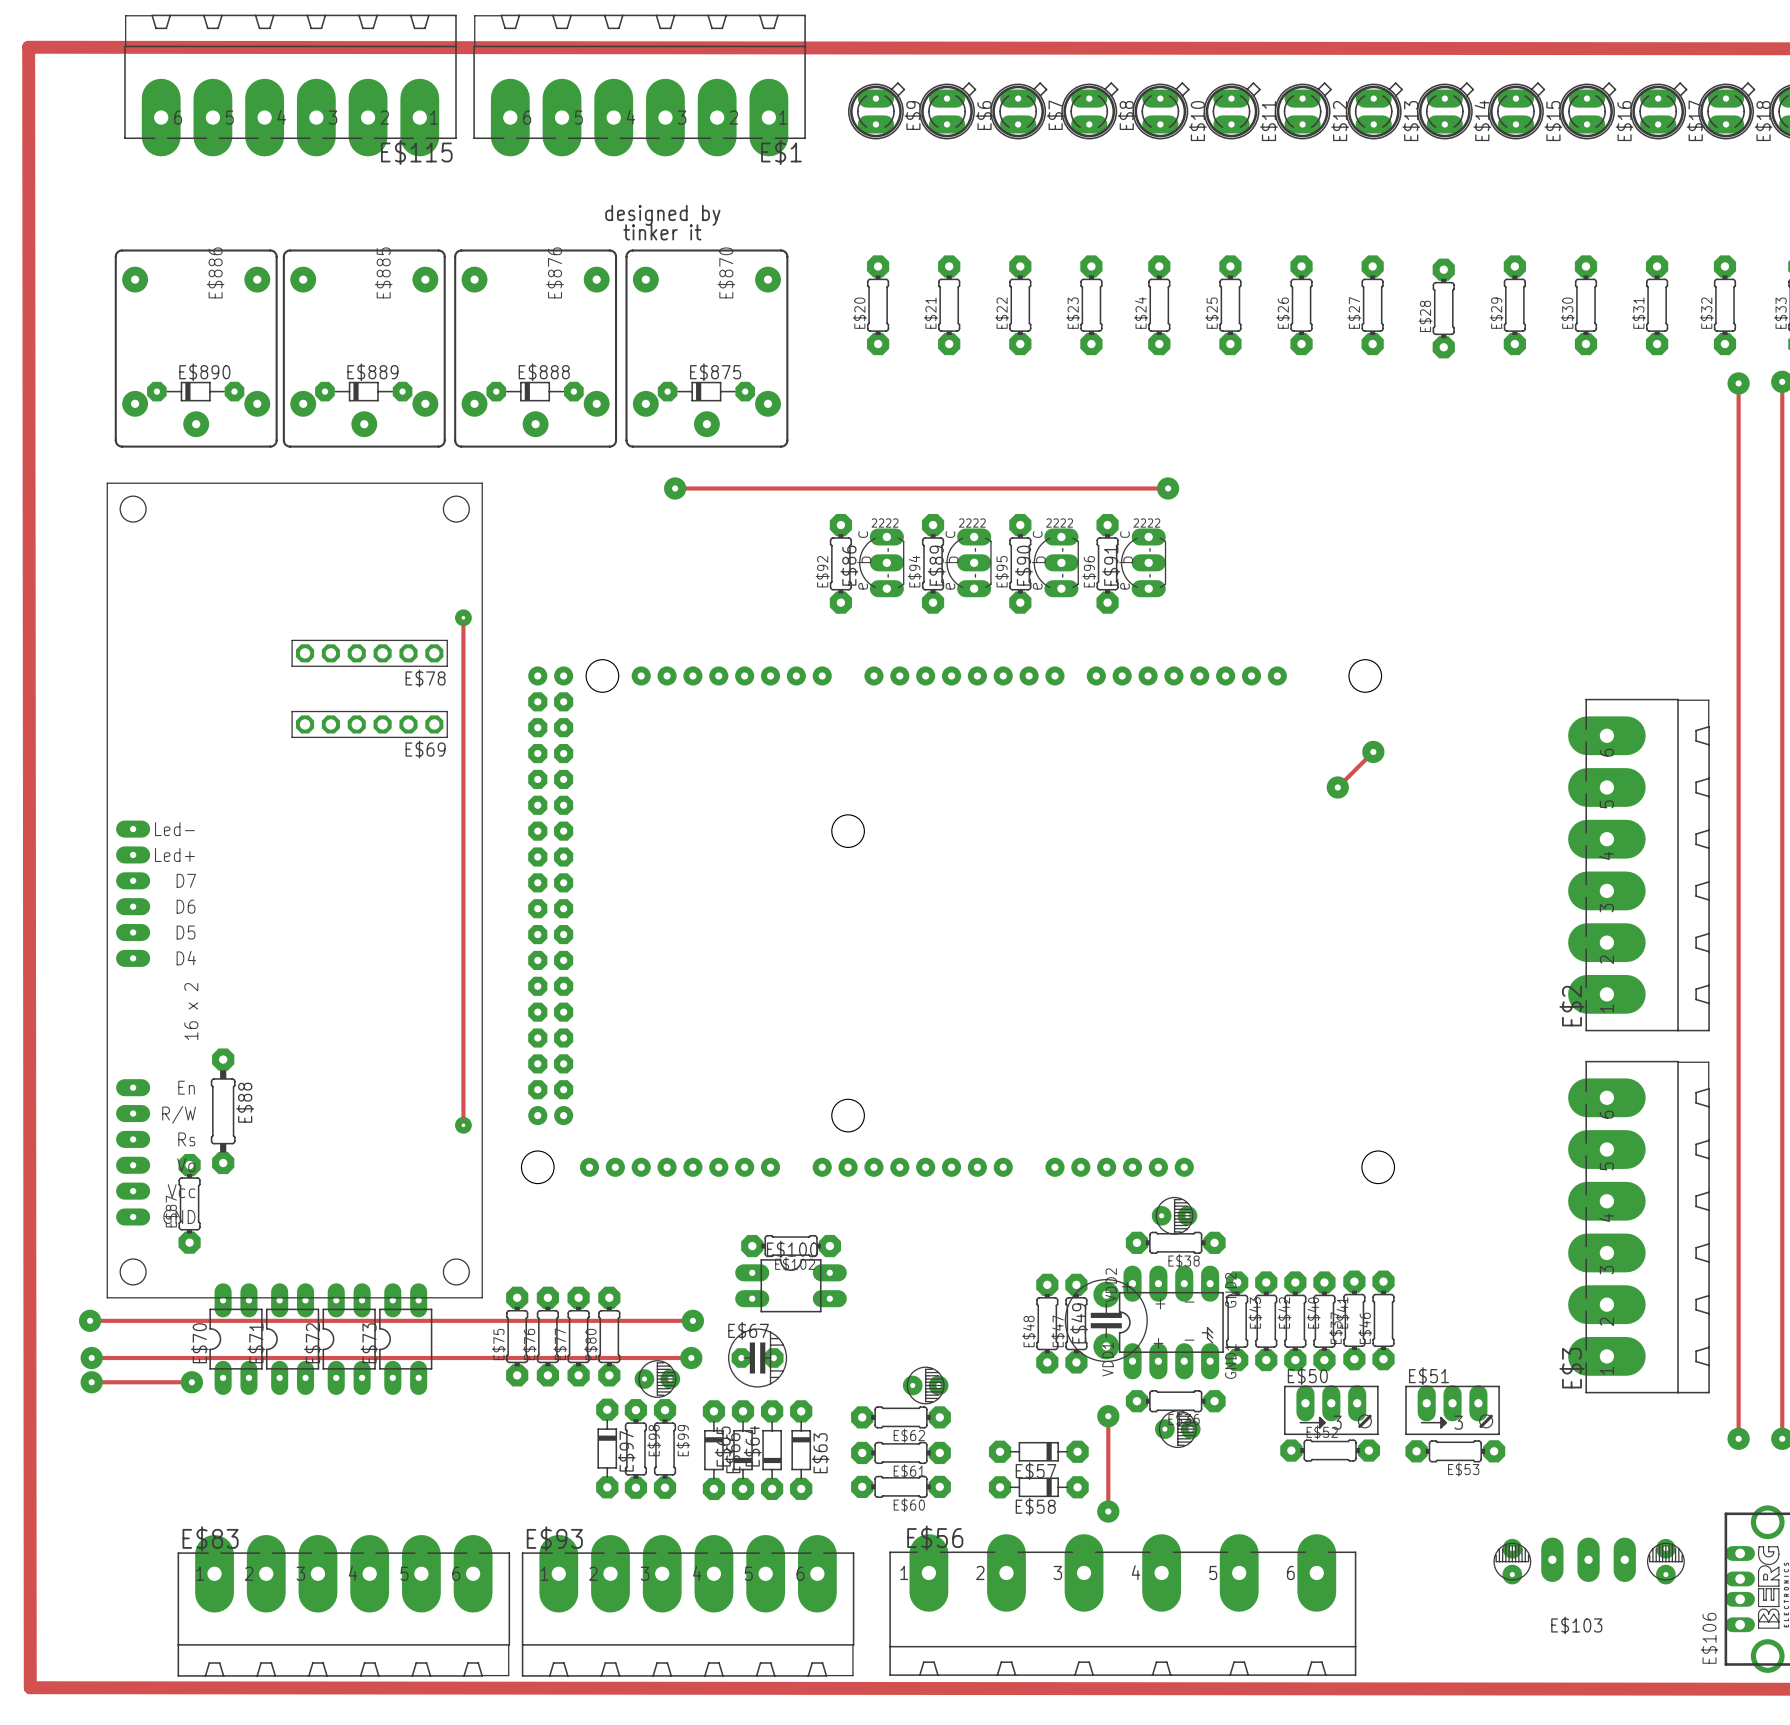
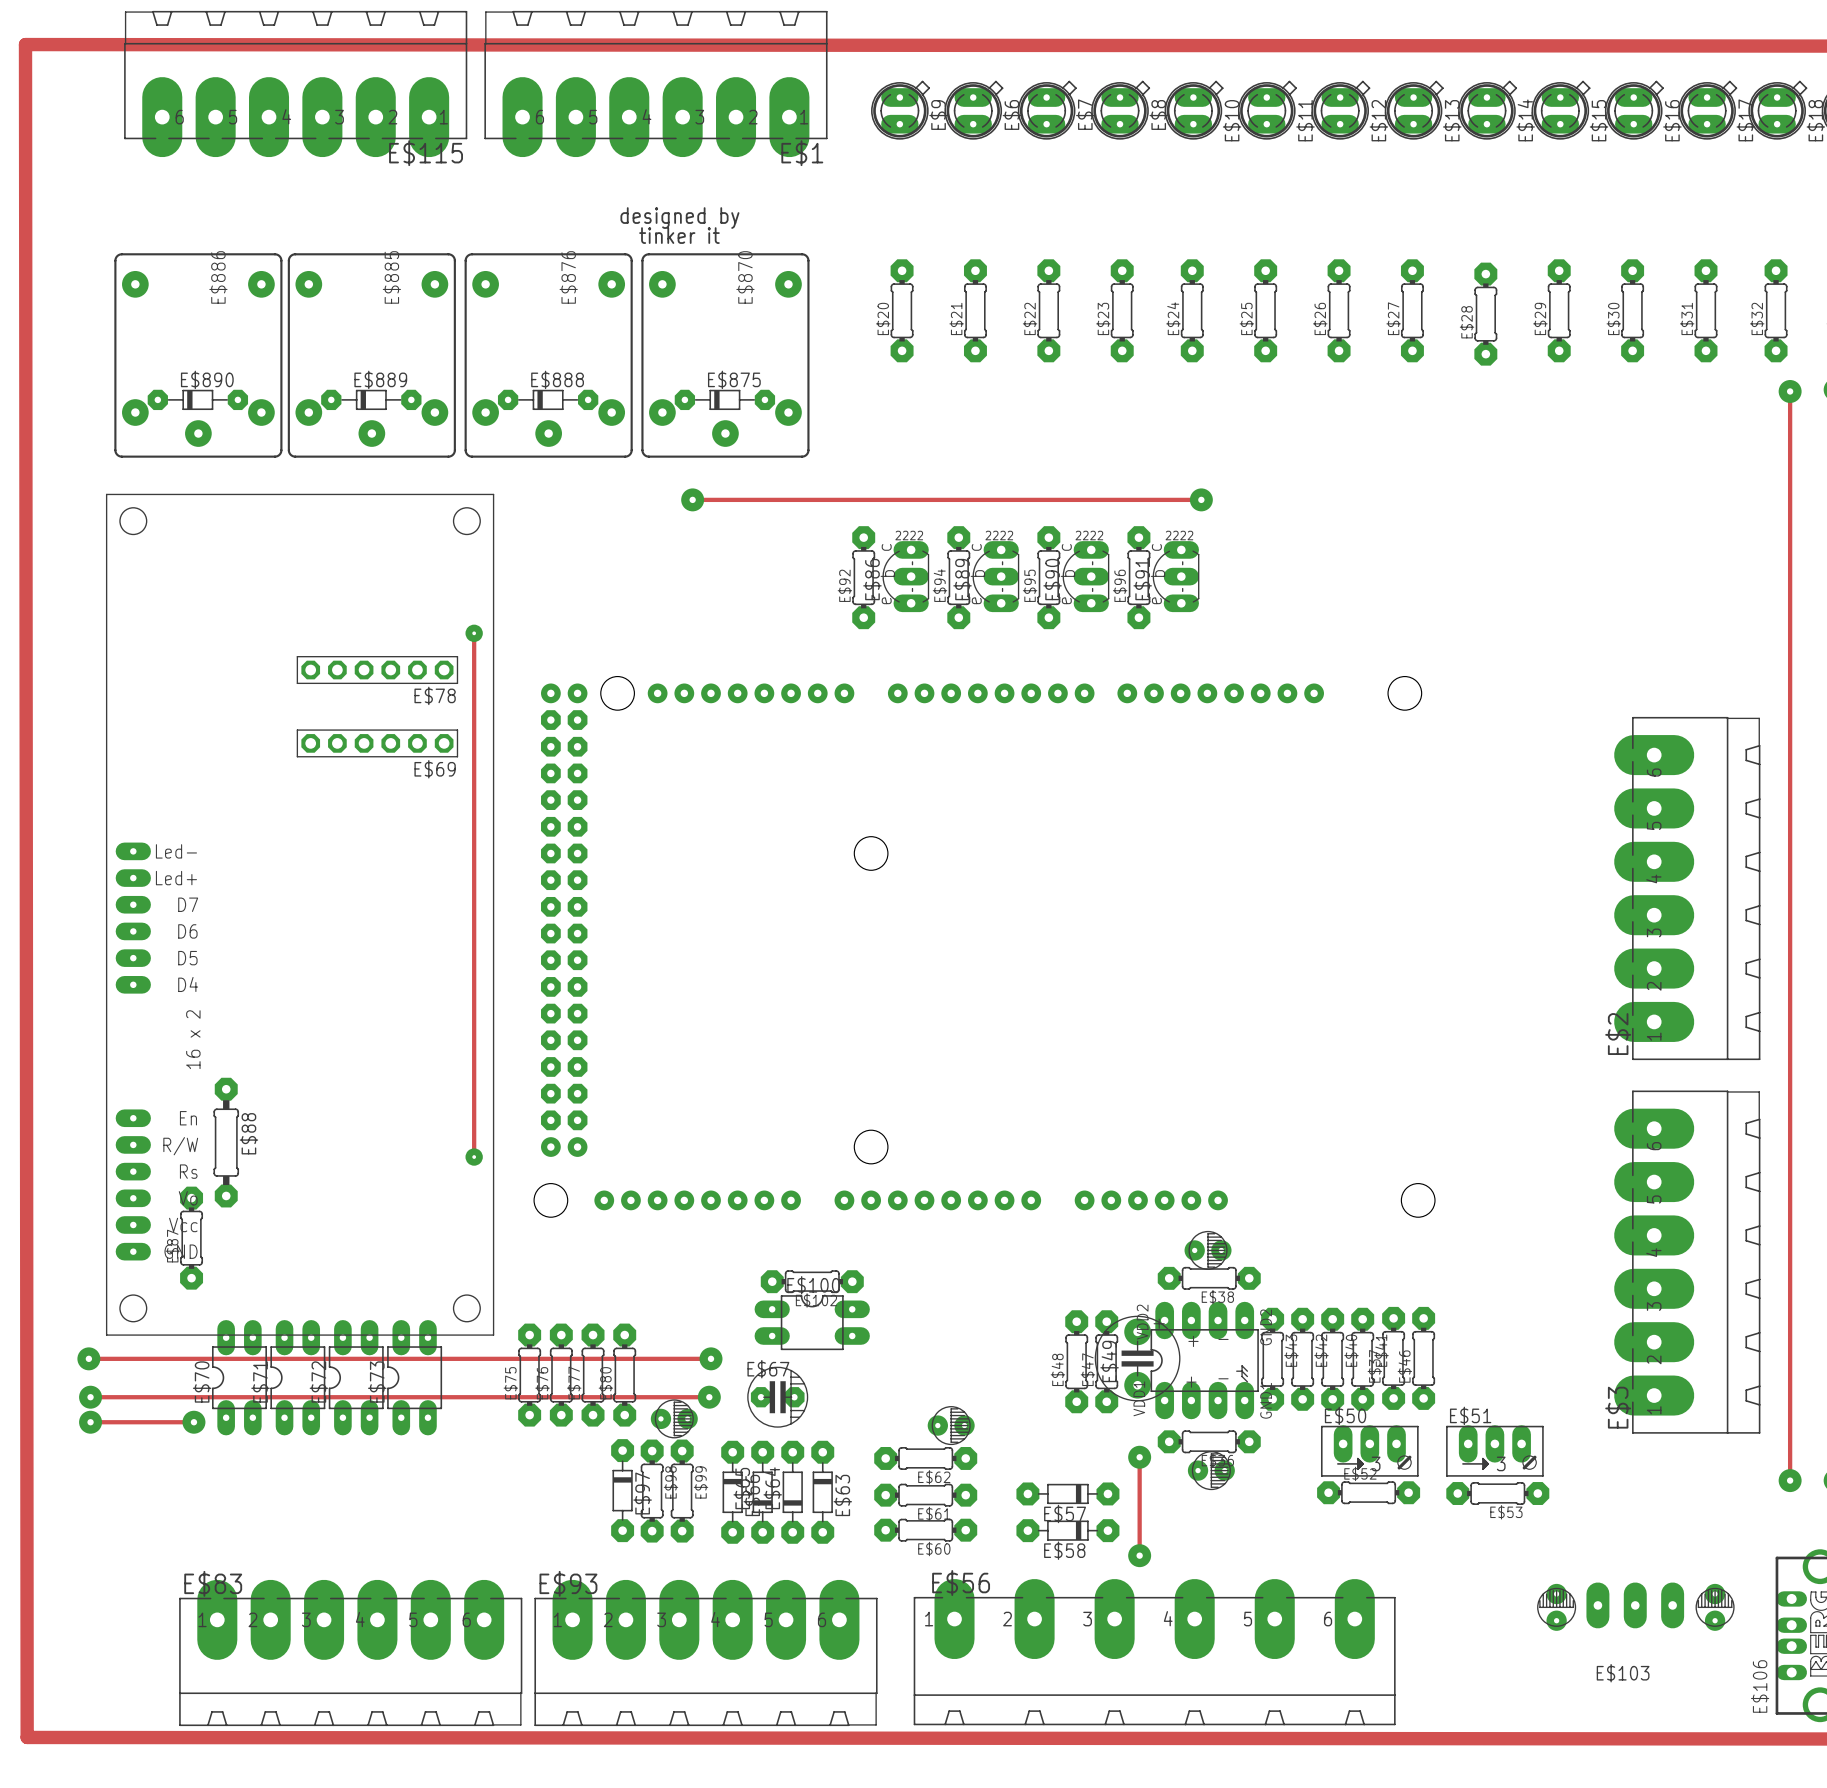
track: (1373, 751) (1337, 787) -> none
via: (1373, 751) -> none
via: (1337, 787) -> none

